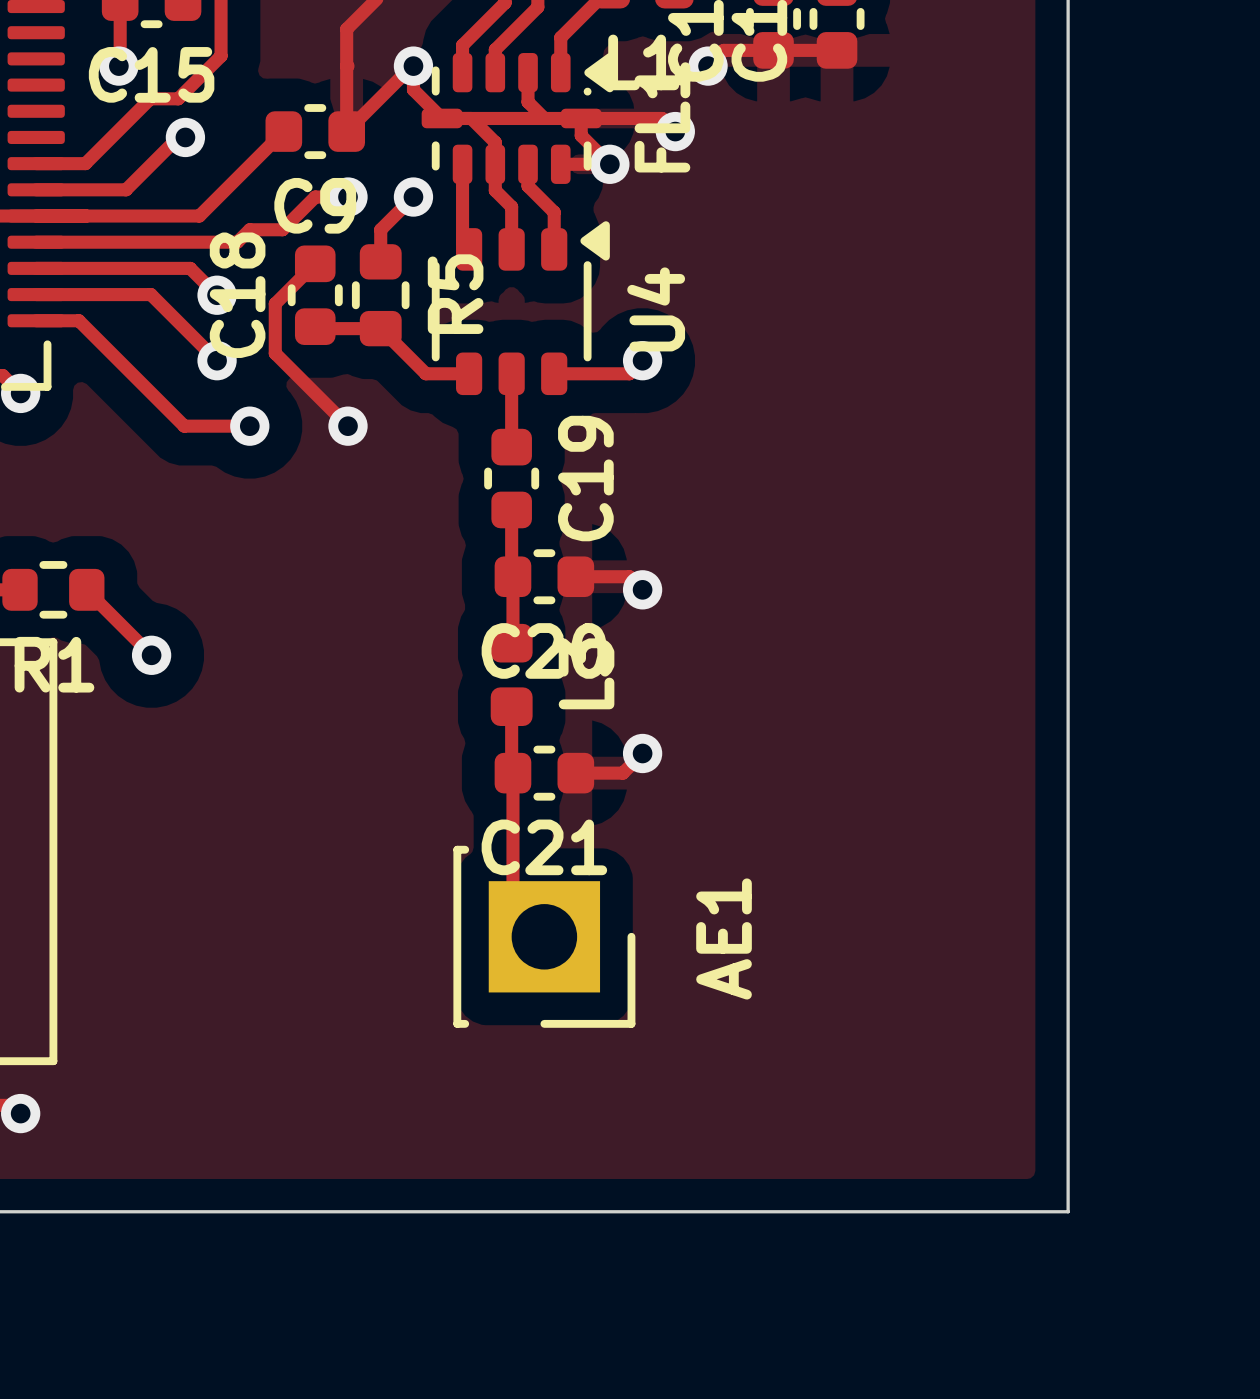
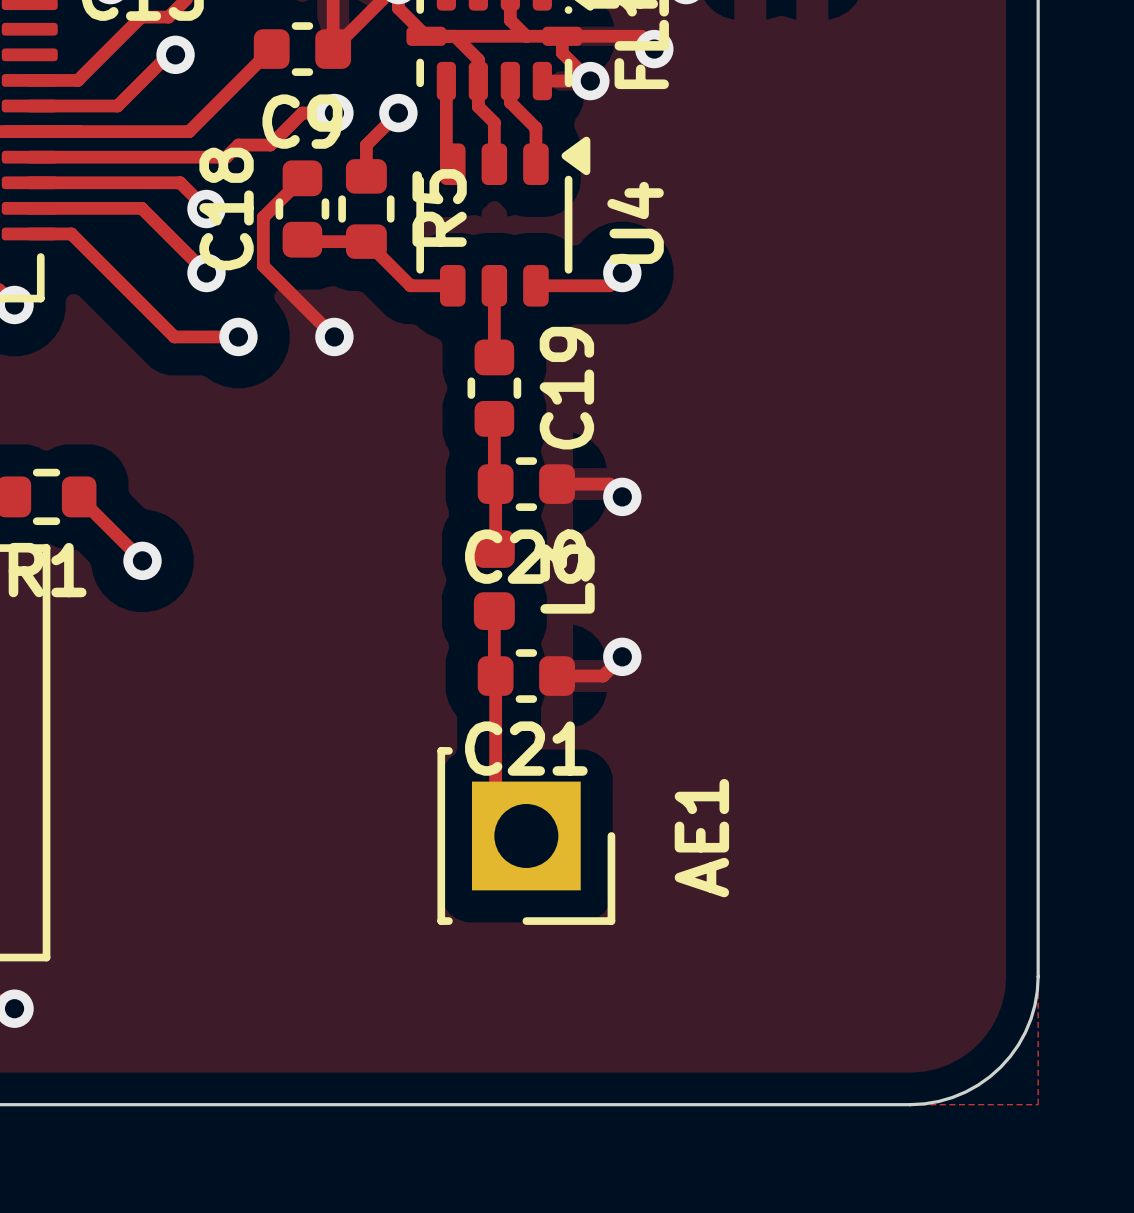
board edge: (1068, 1080) (1068, 1211) (937, 1211) -> (1038, 976) (1037, 991) (1030, 1018) (1018, 1044) (1000, 1067) (978, 1085) (952, 1097) (924, 1103) (910, 1104)

